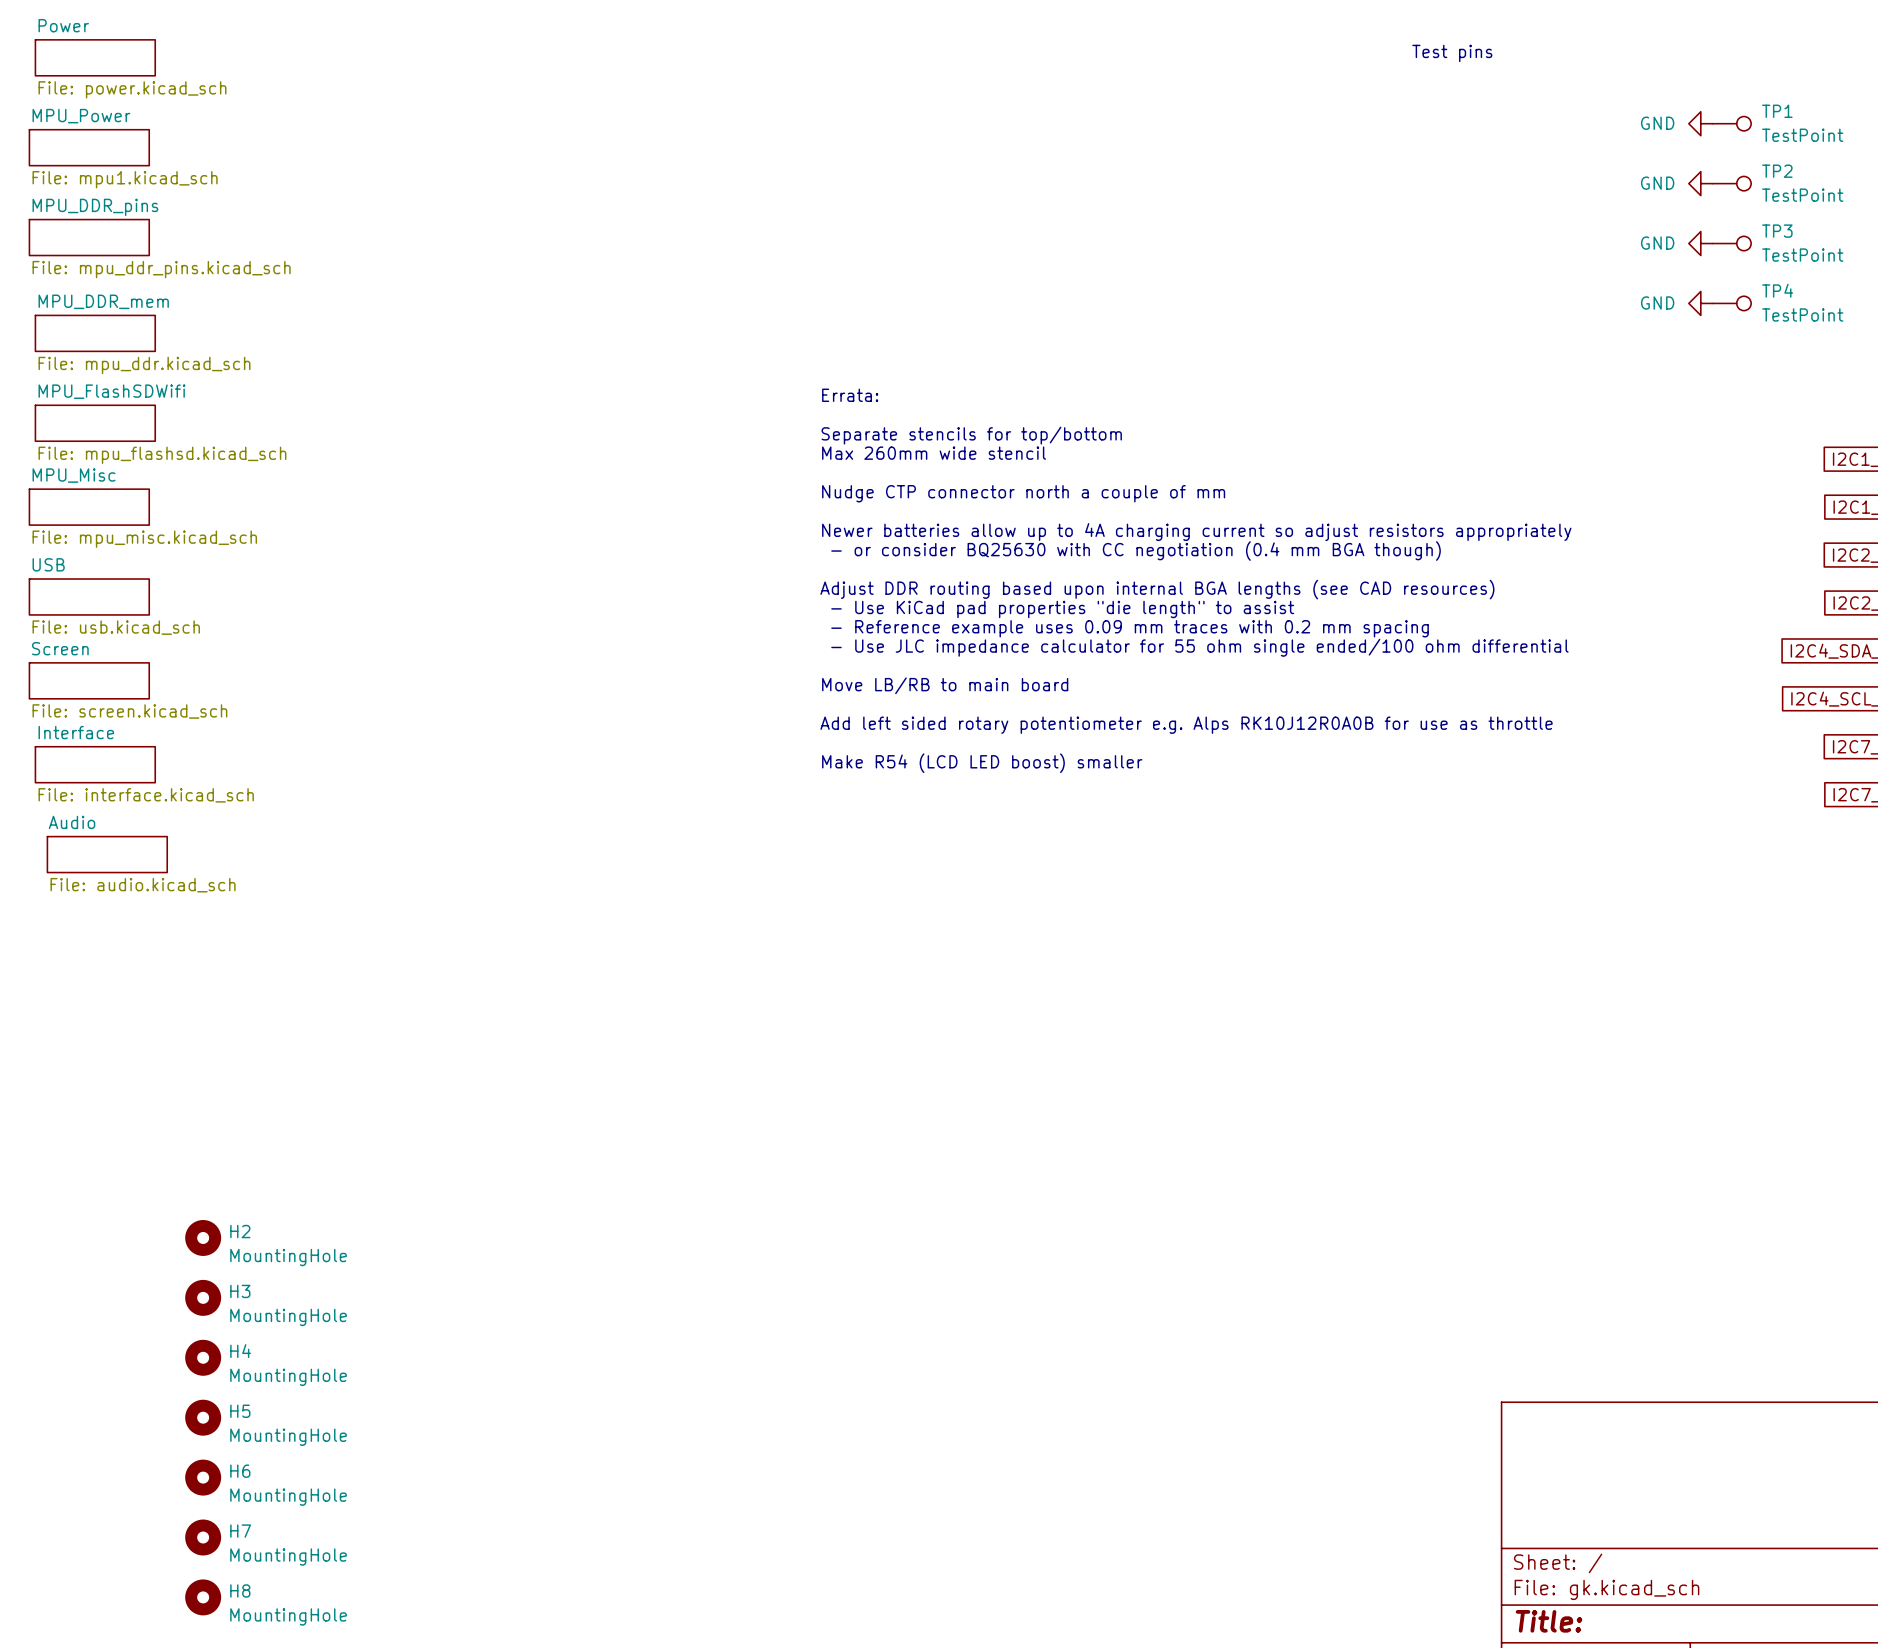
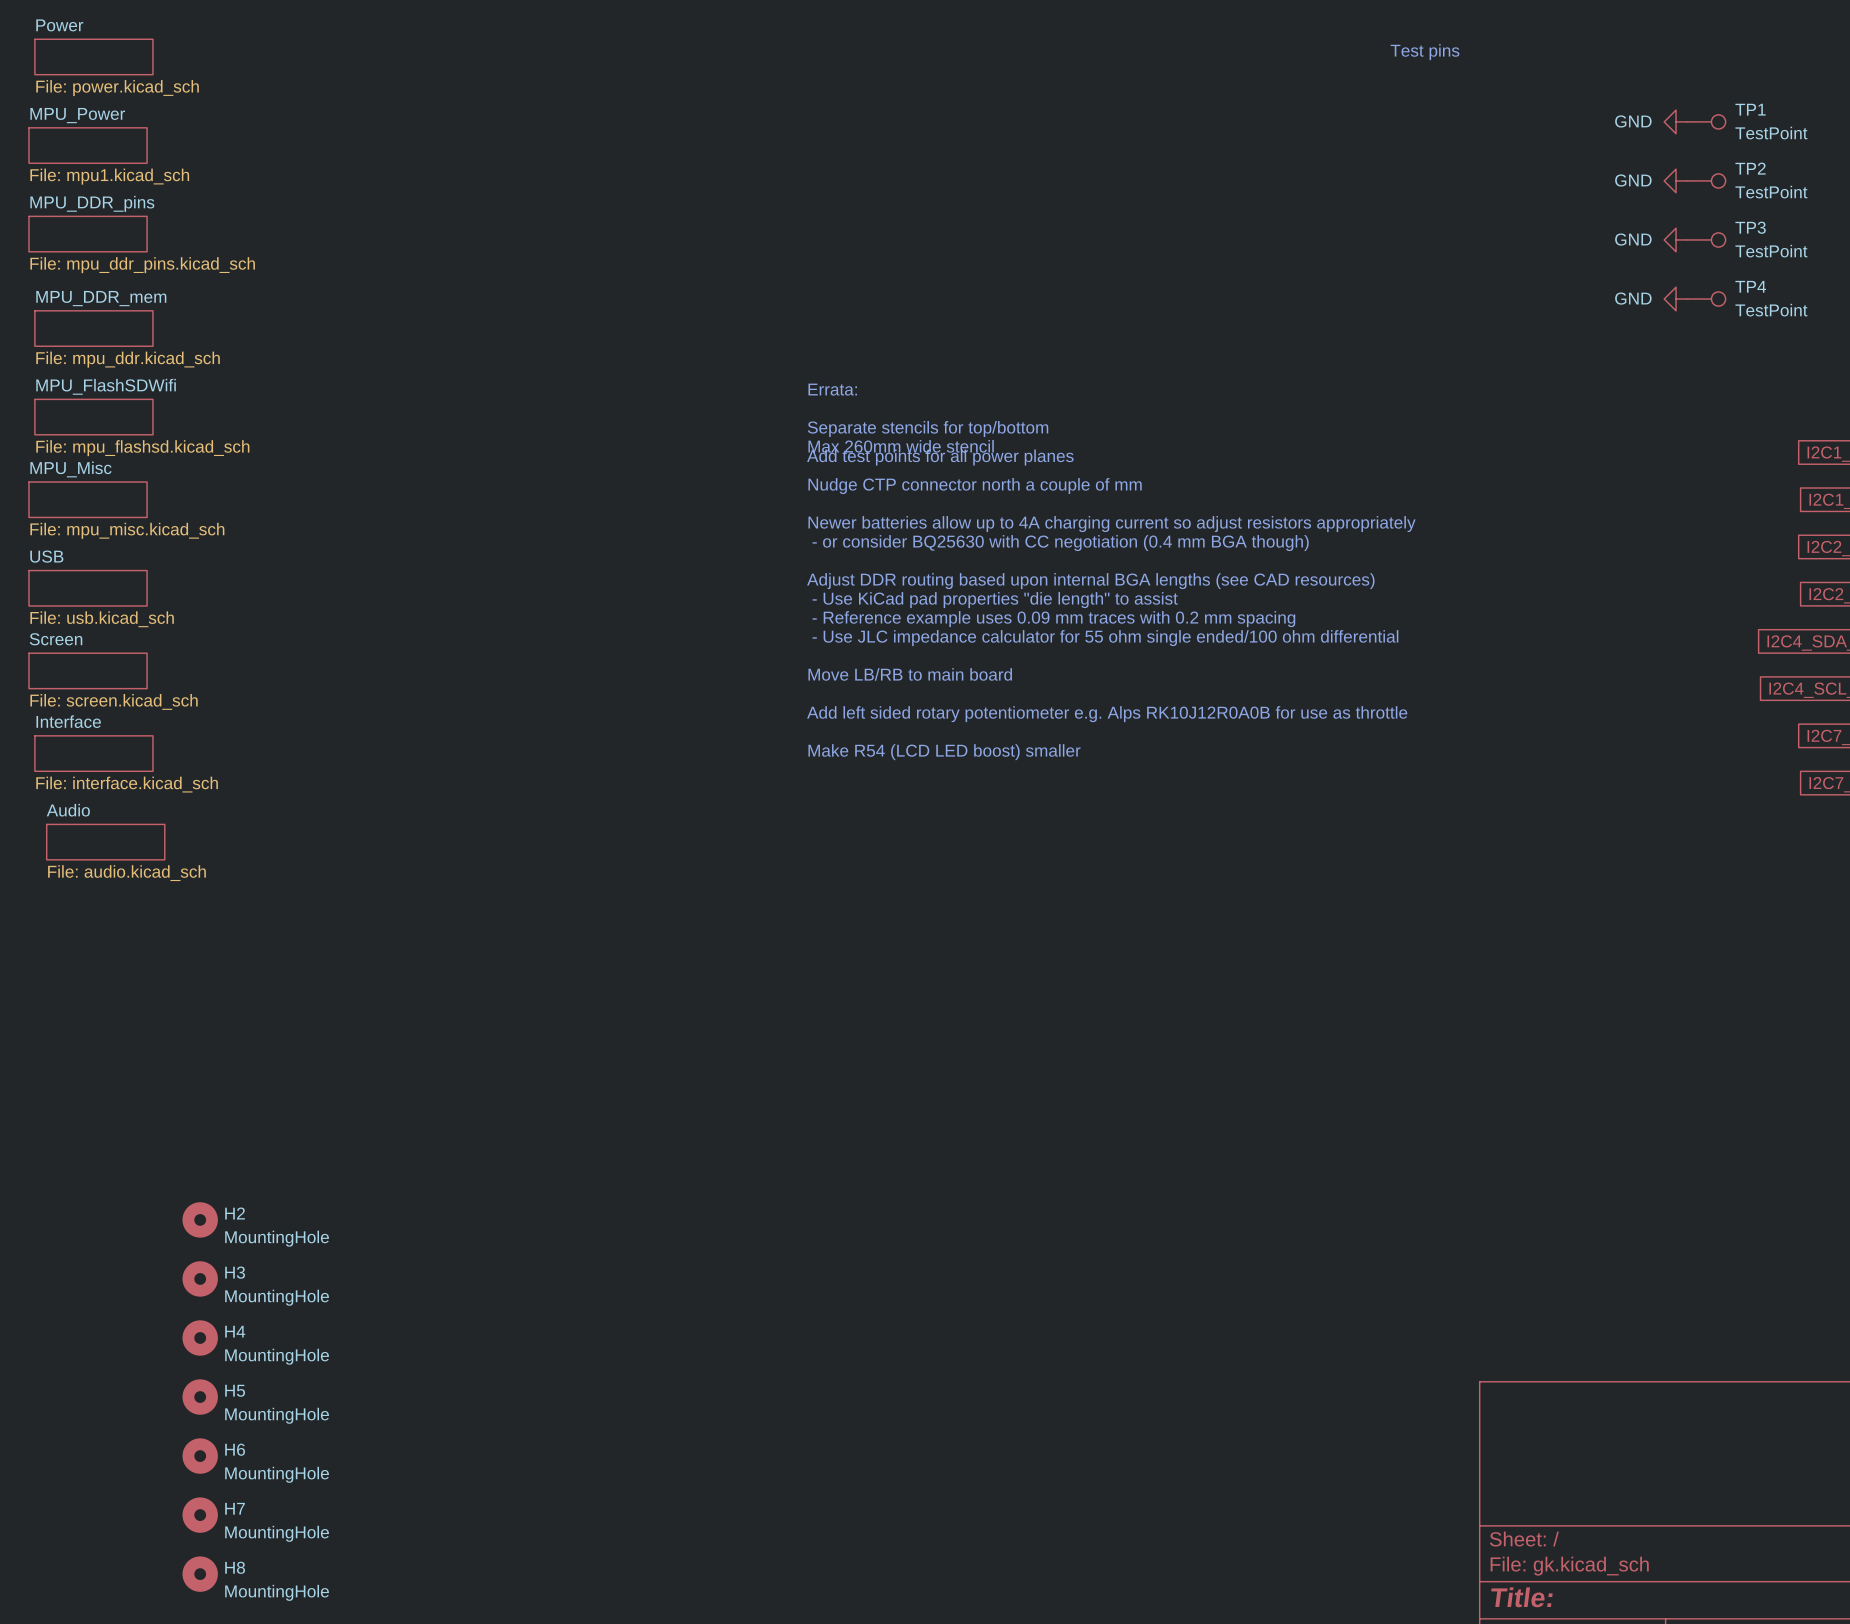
text: none -> Add test points for all power planes (940, 457)

